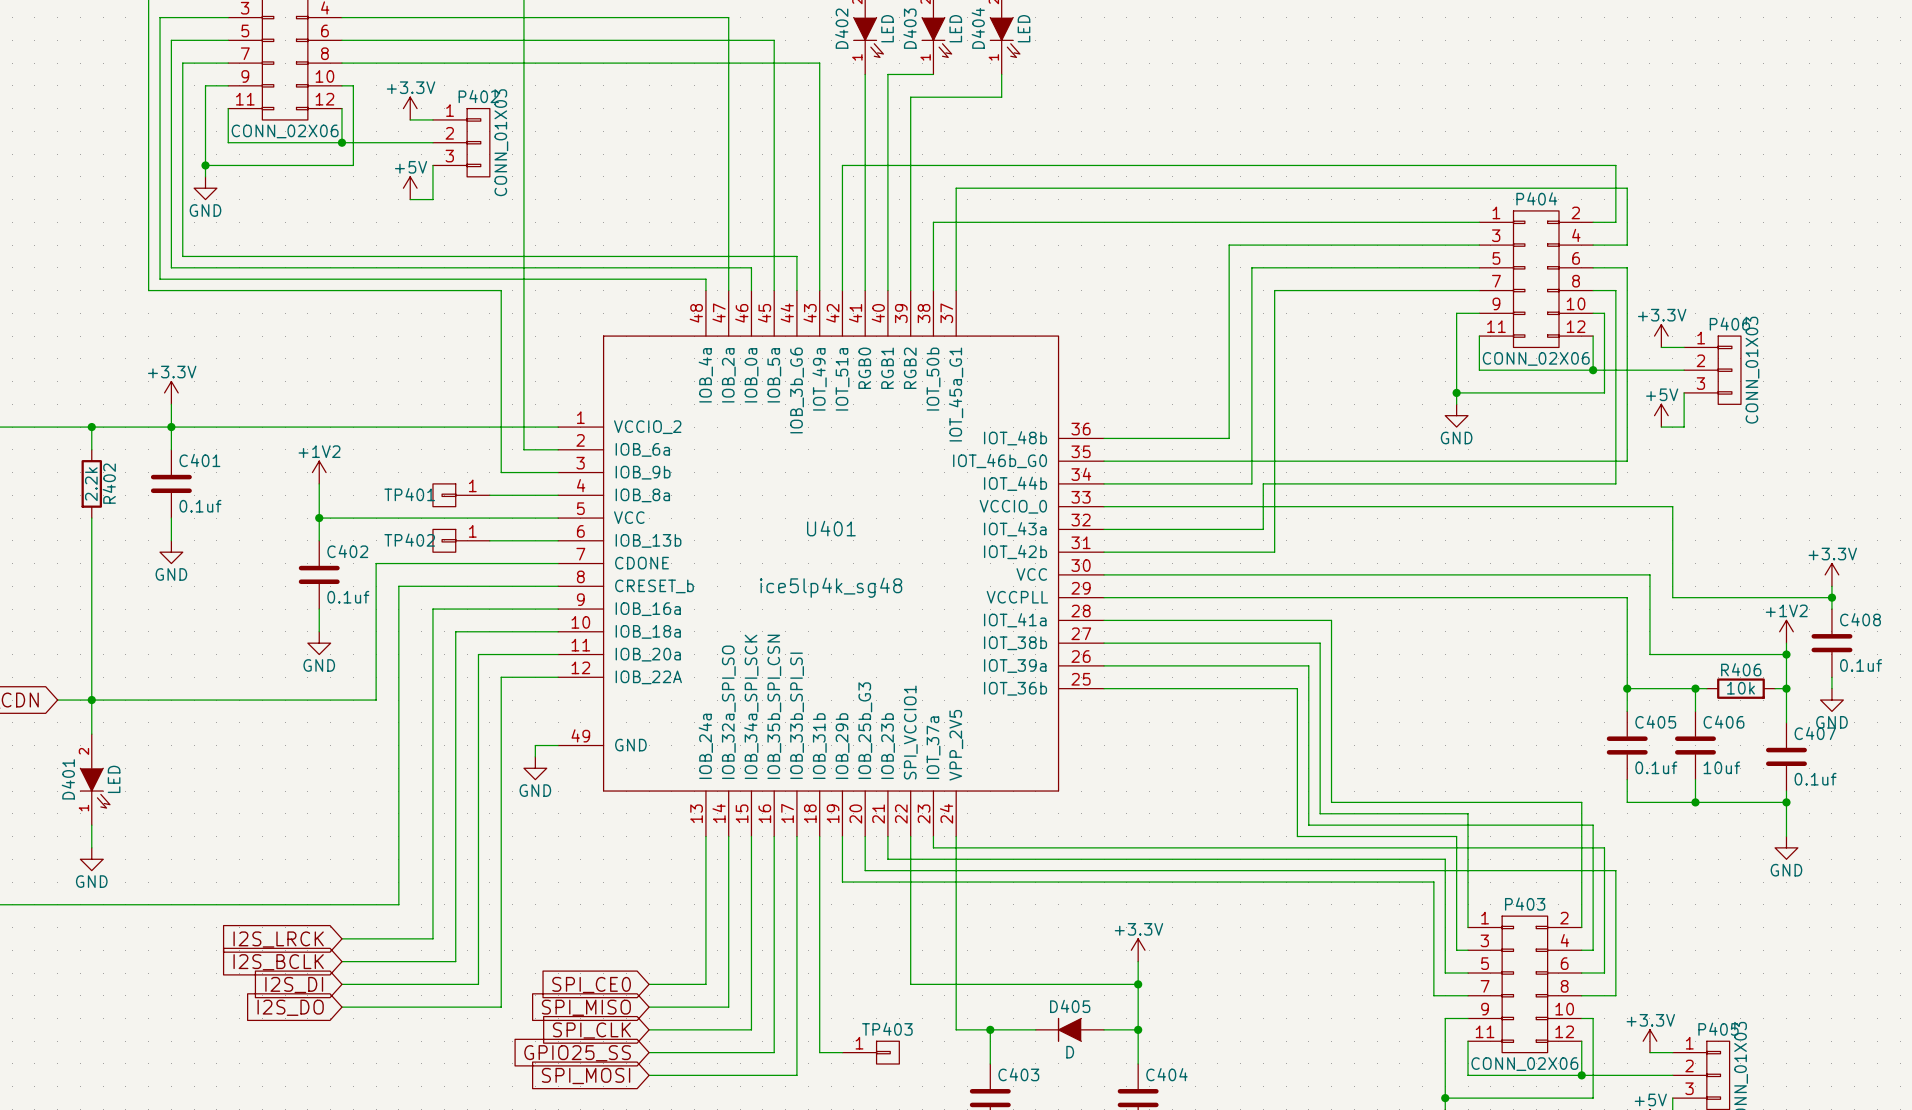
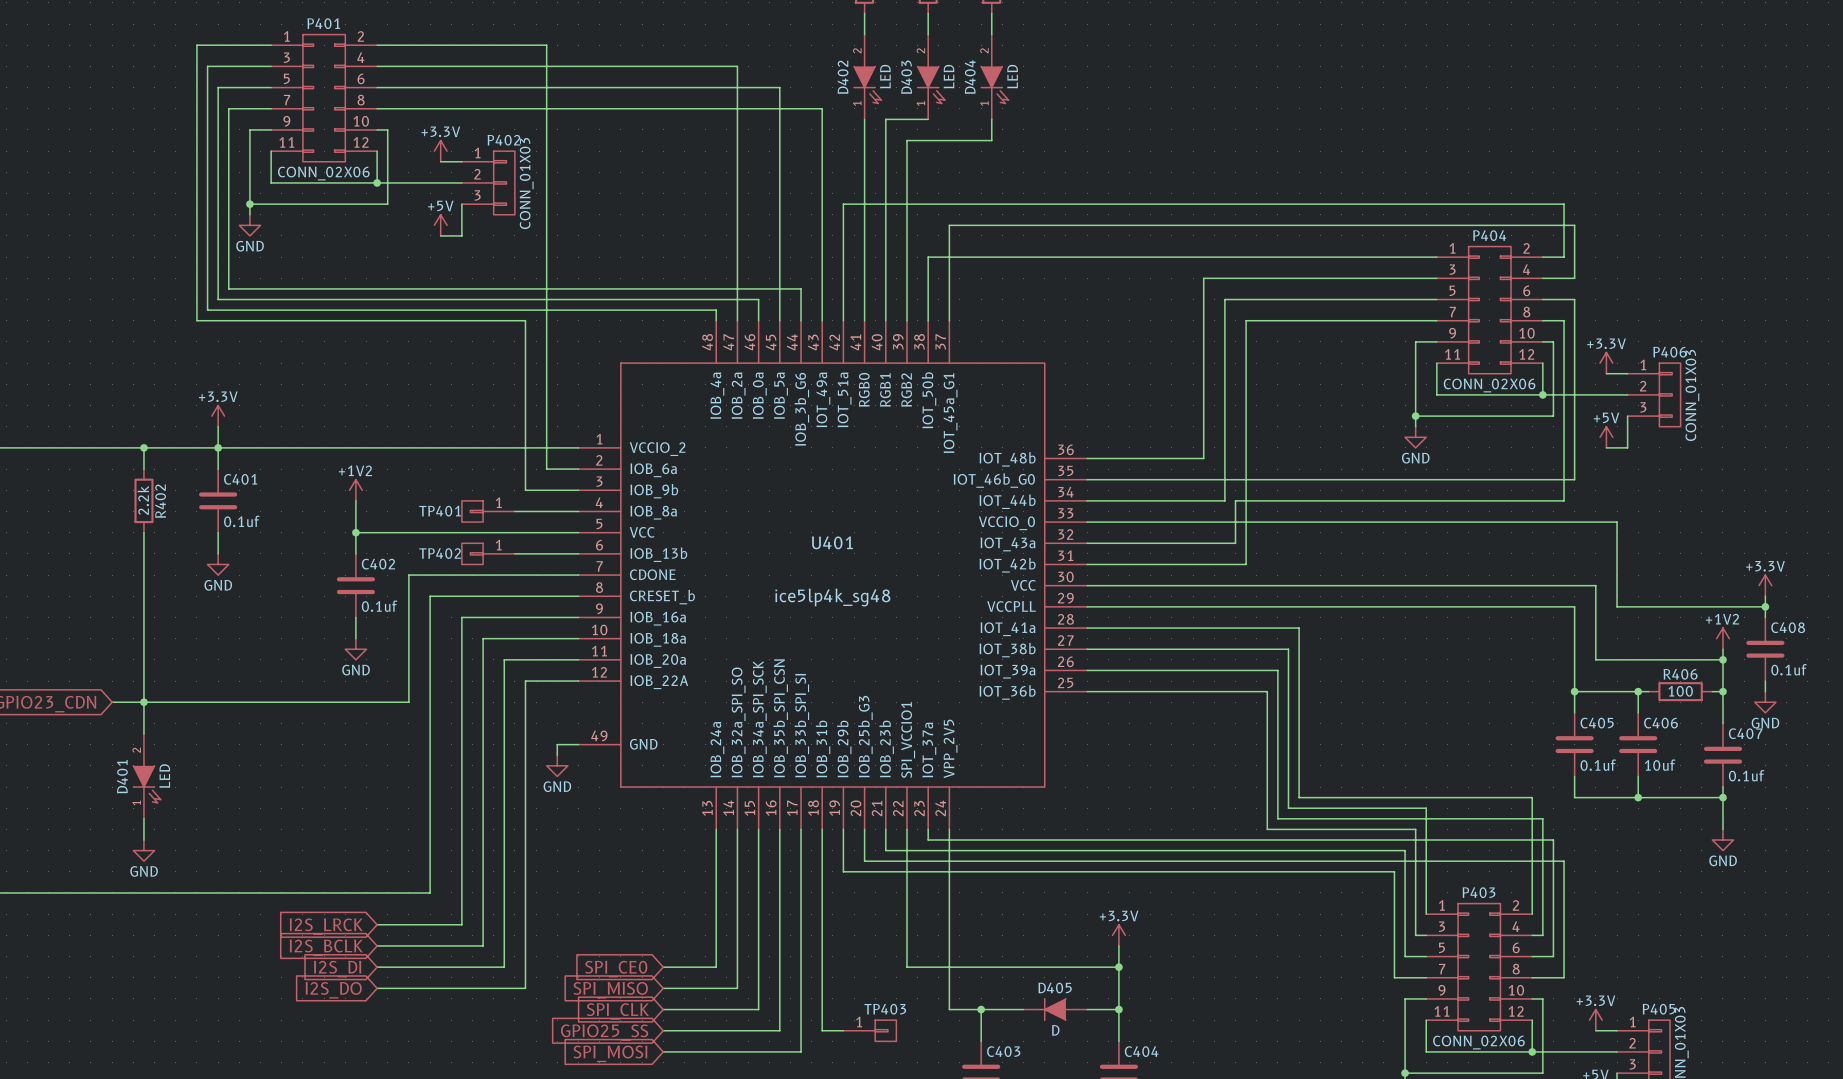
R406 value: 10k (1740, 688) -> 100 (1680, 691)

